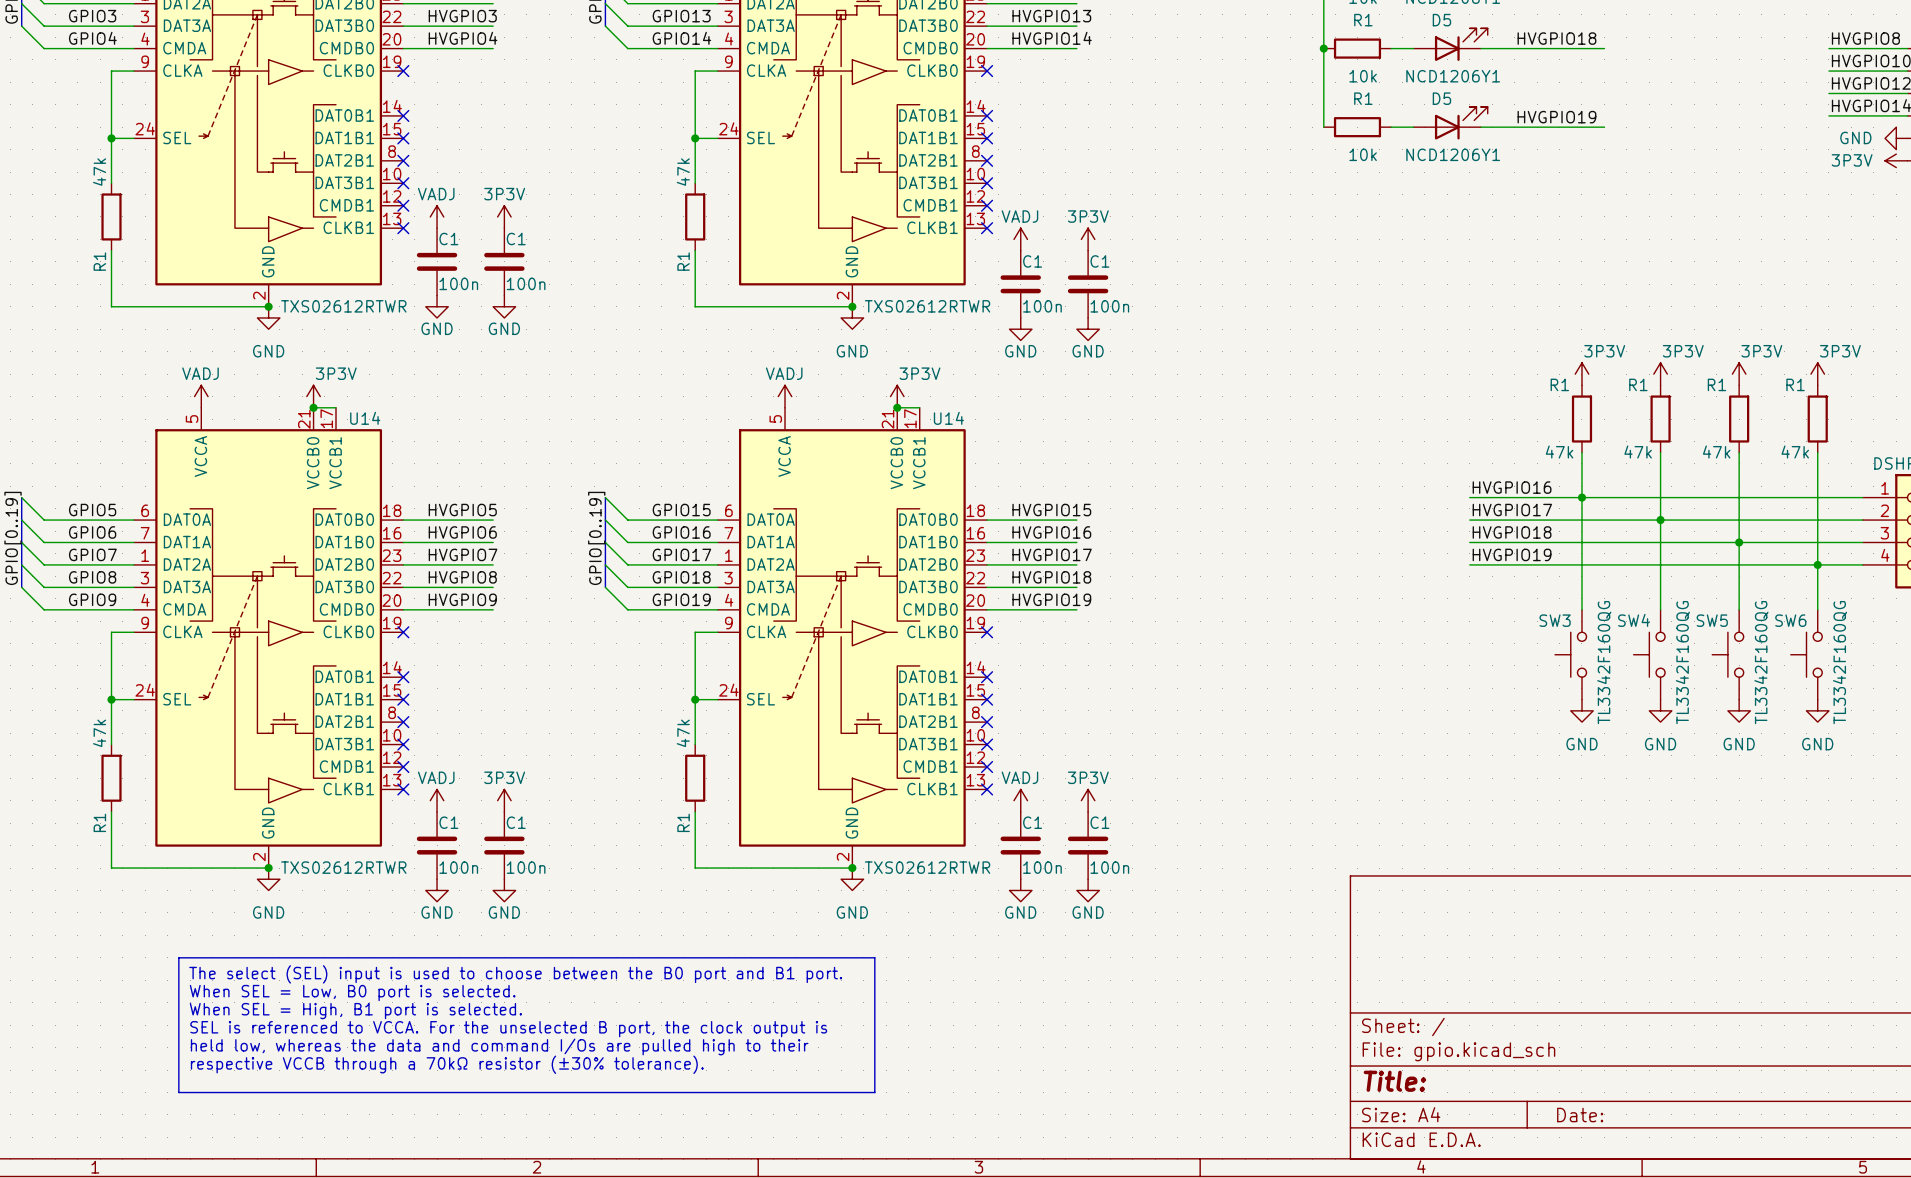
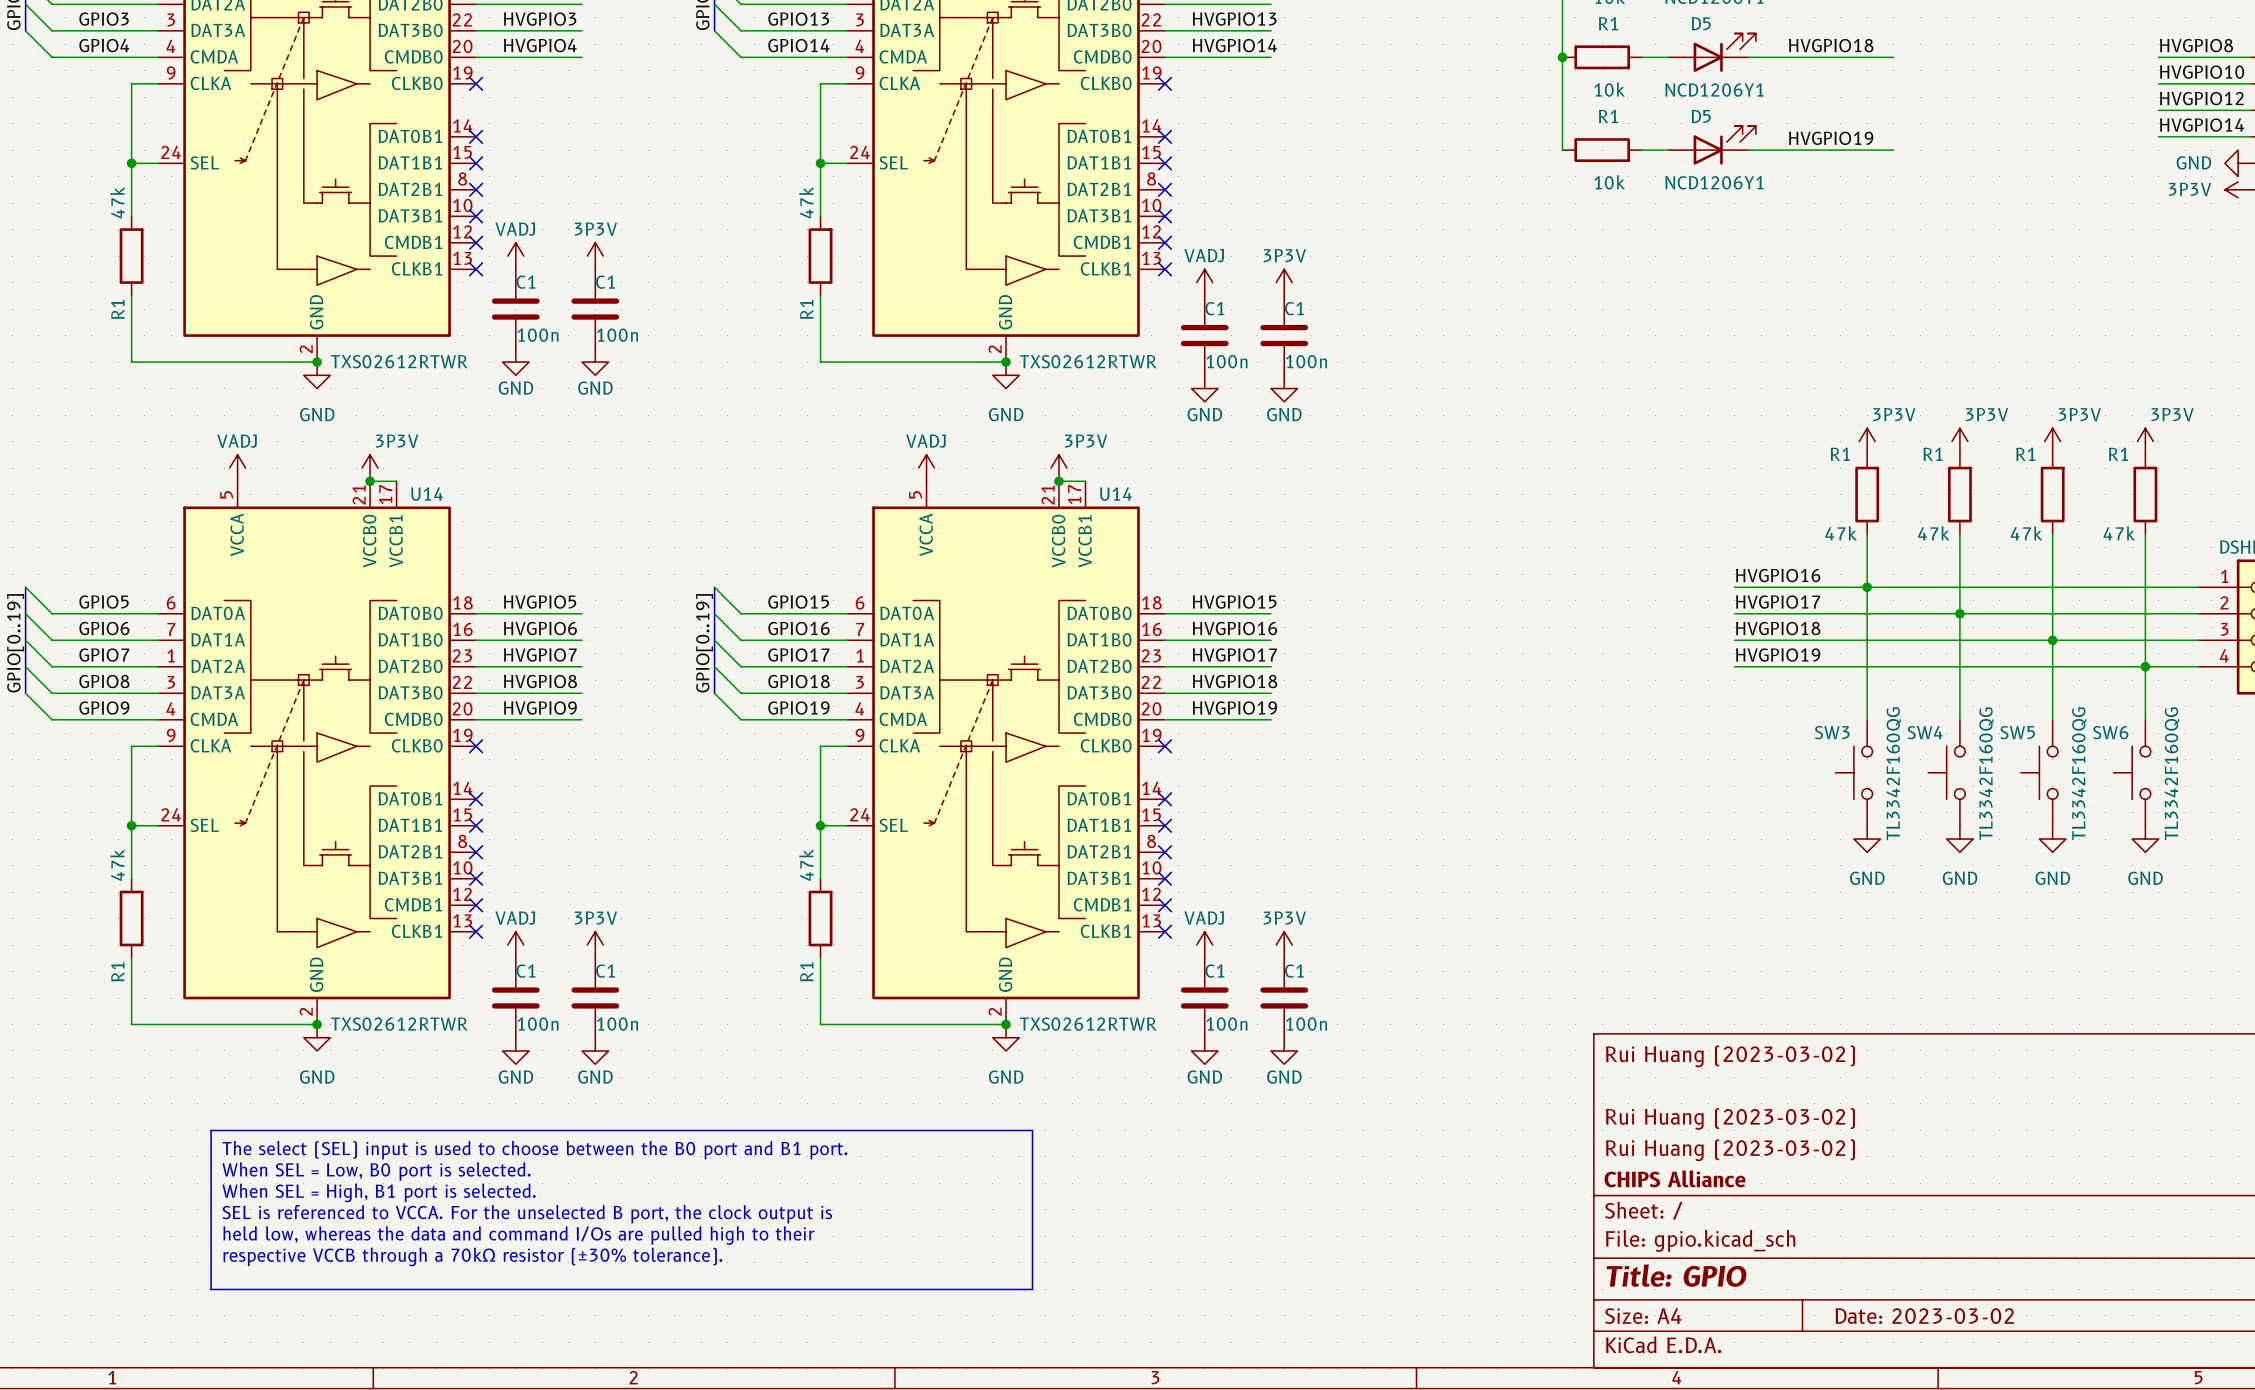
title block: none -> Rui Huang (2023-03-02) (1730, 1056)
title block: none -> Rui Huang (2023-03-02) (1730, 1119)
title block: none -> Rui Huang (2023-03-02) (1730, 1150)
title block: none -> CHIPS Alliance (1674, 1178)
title block: Title: (1394, 1081) -> Title: GPIO (1676, 1275)
title block: Date: (1580, 1115) -> Date: 2023-03-02 (1924, 1316)

